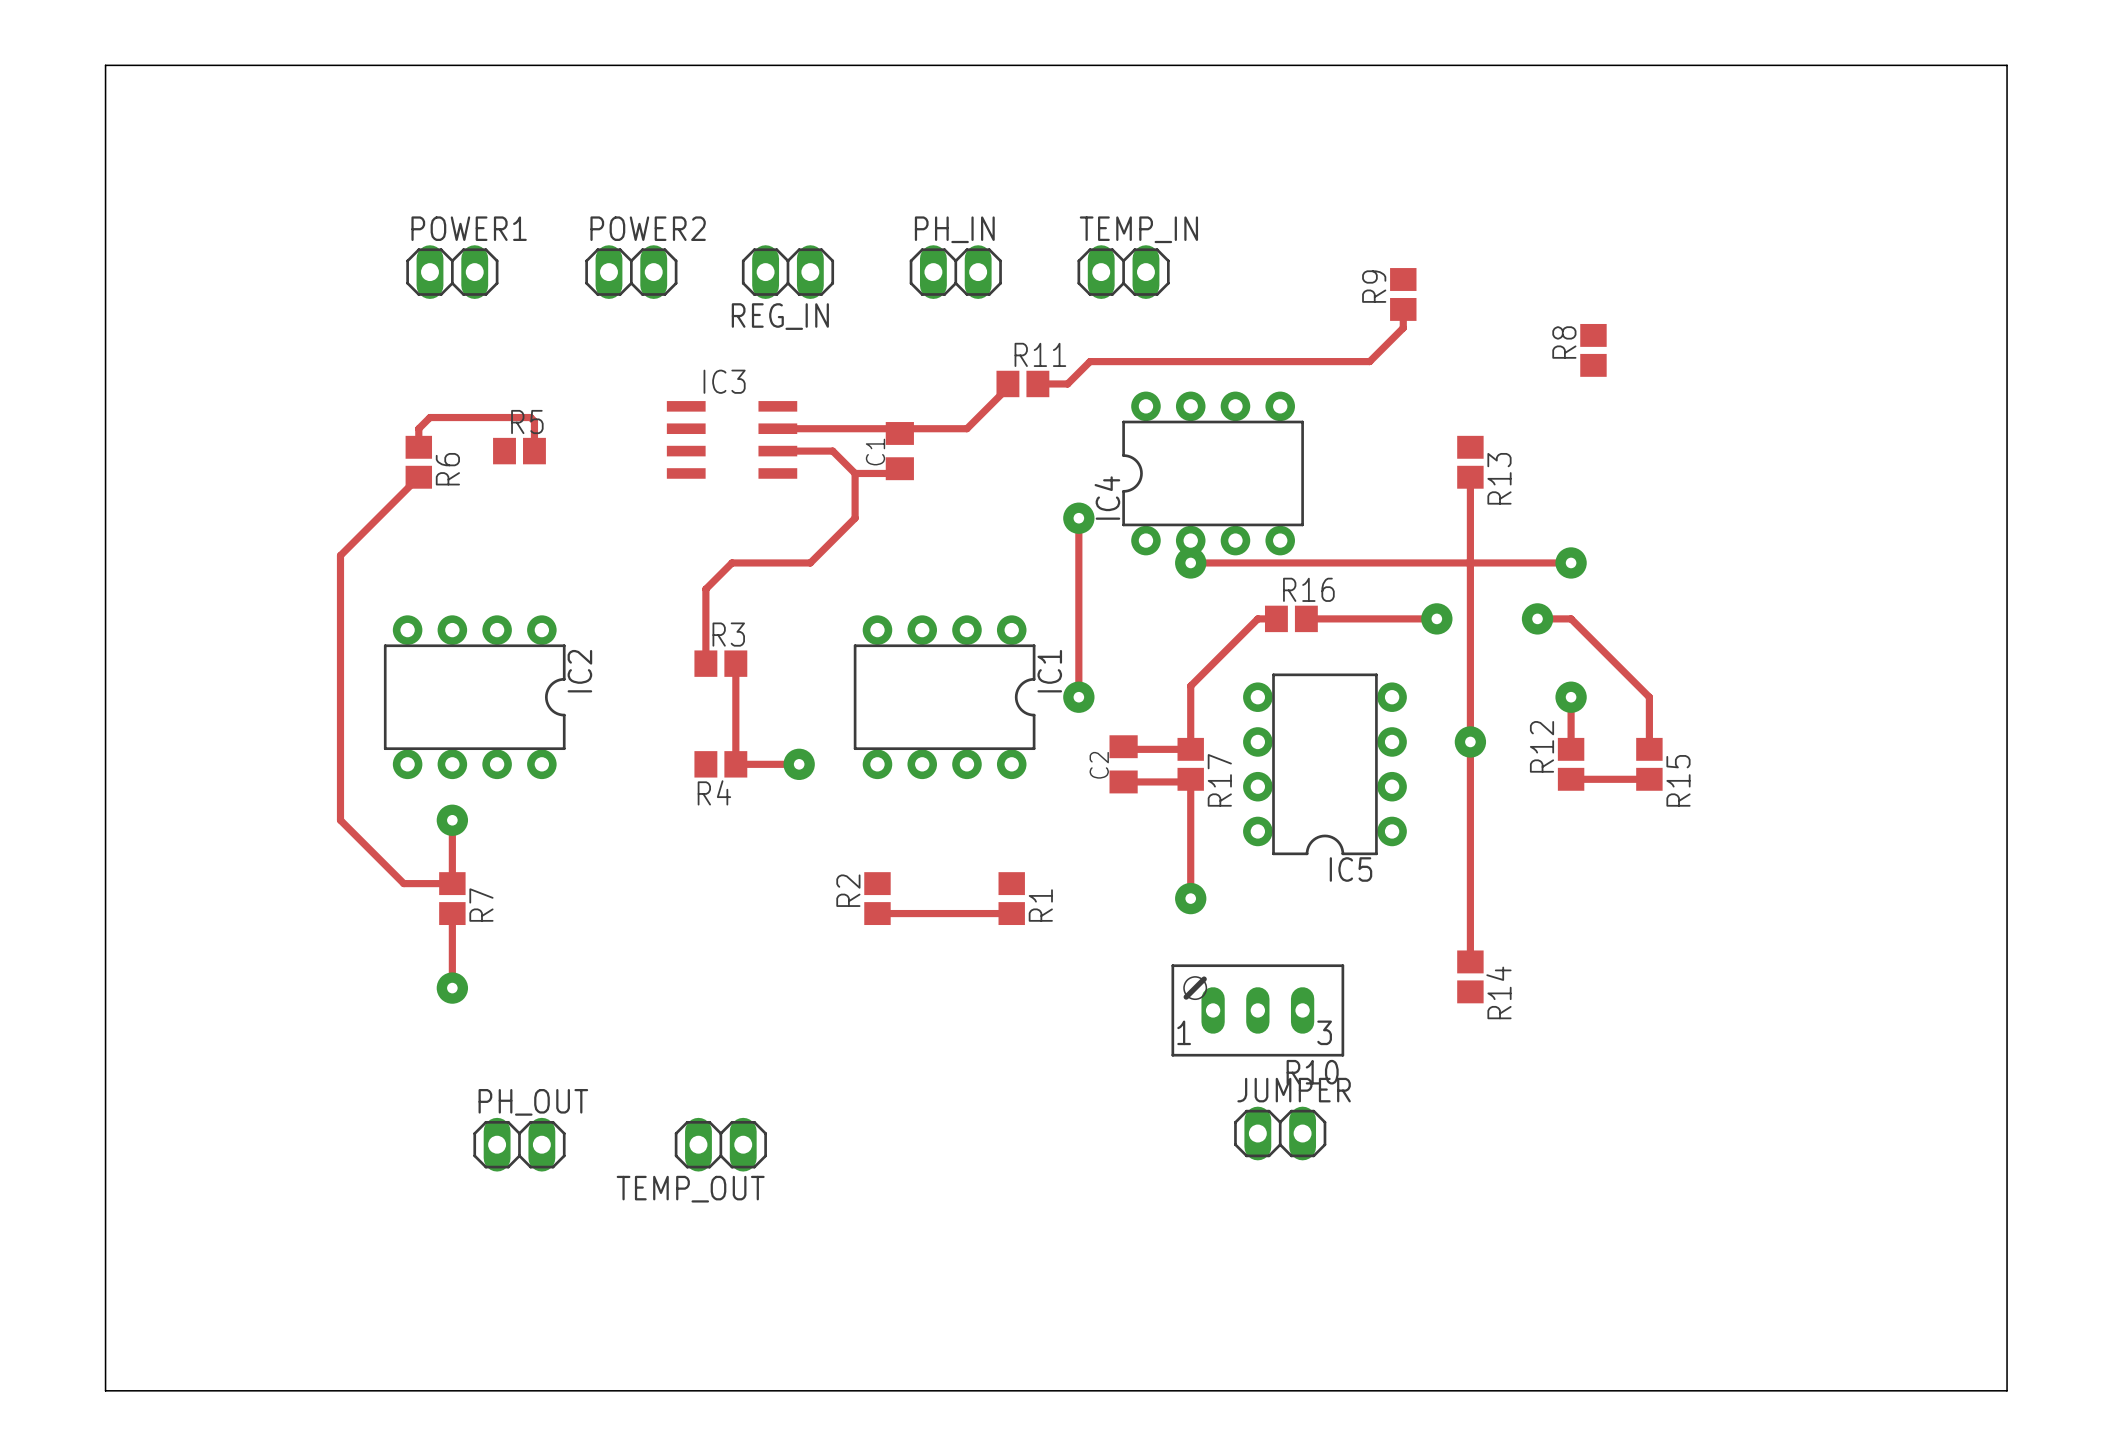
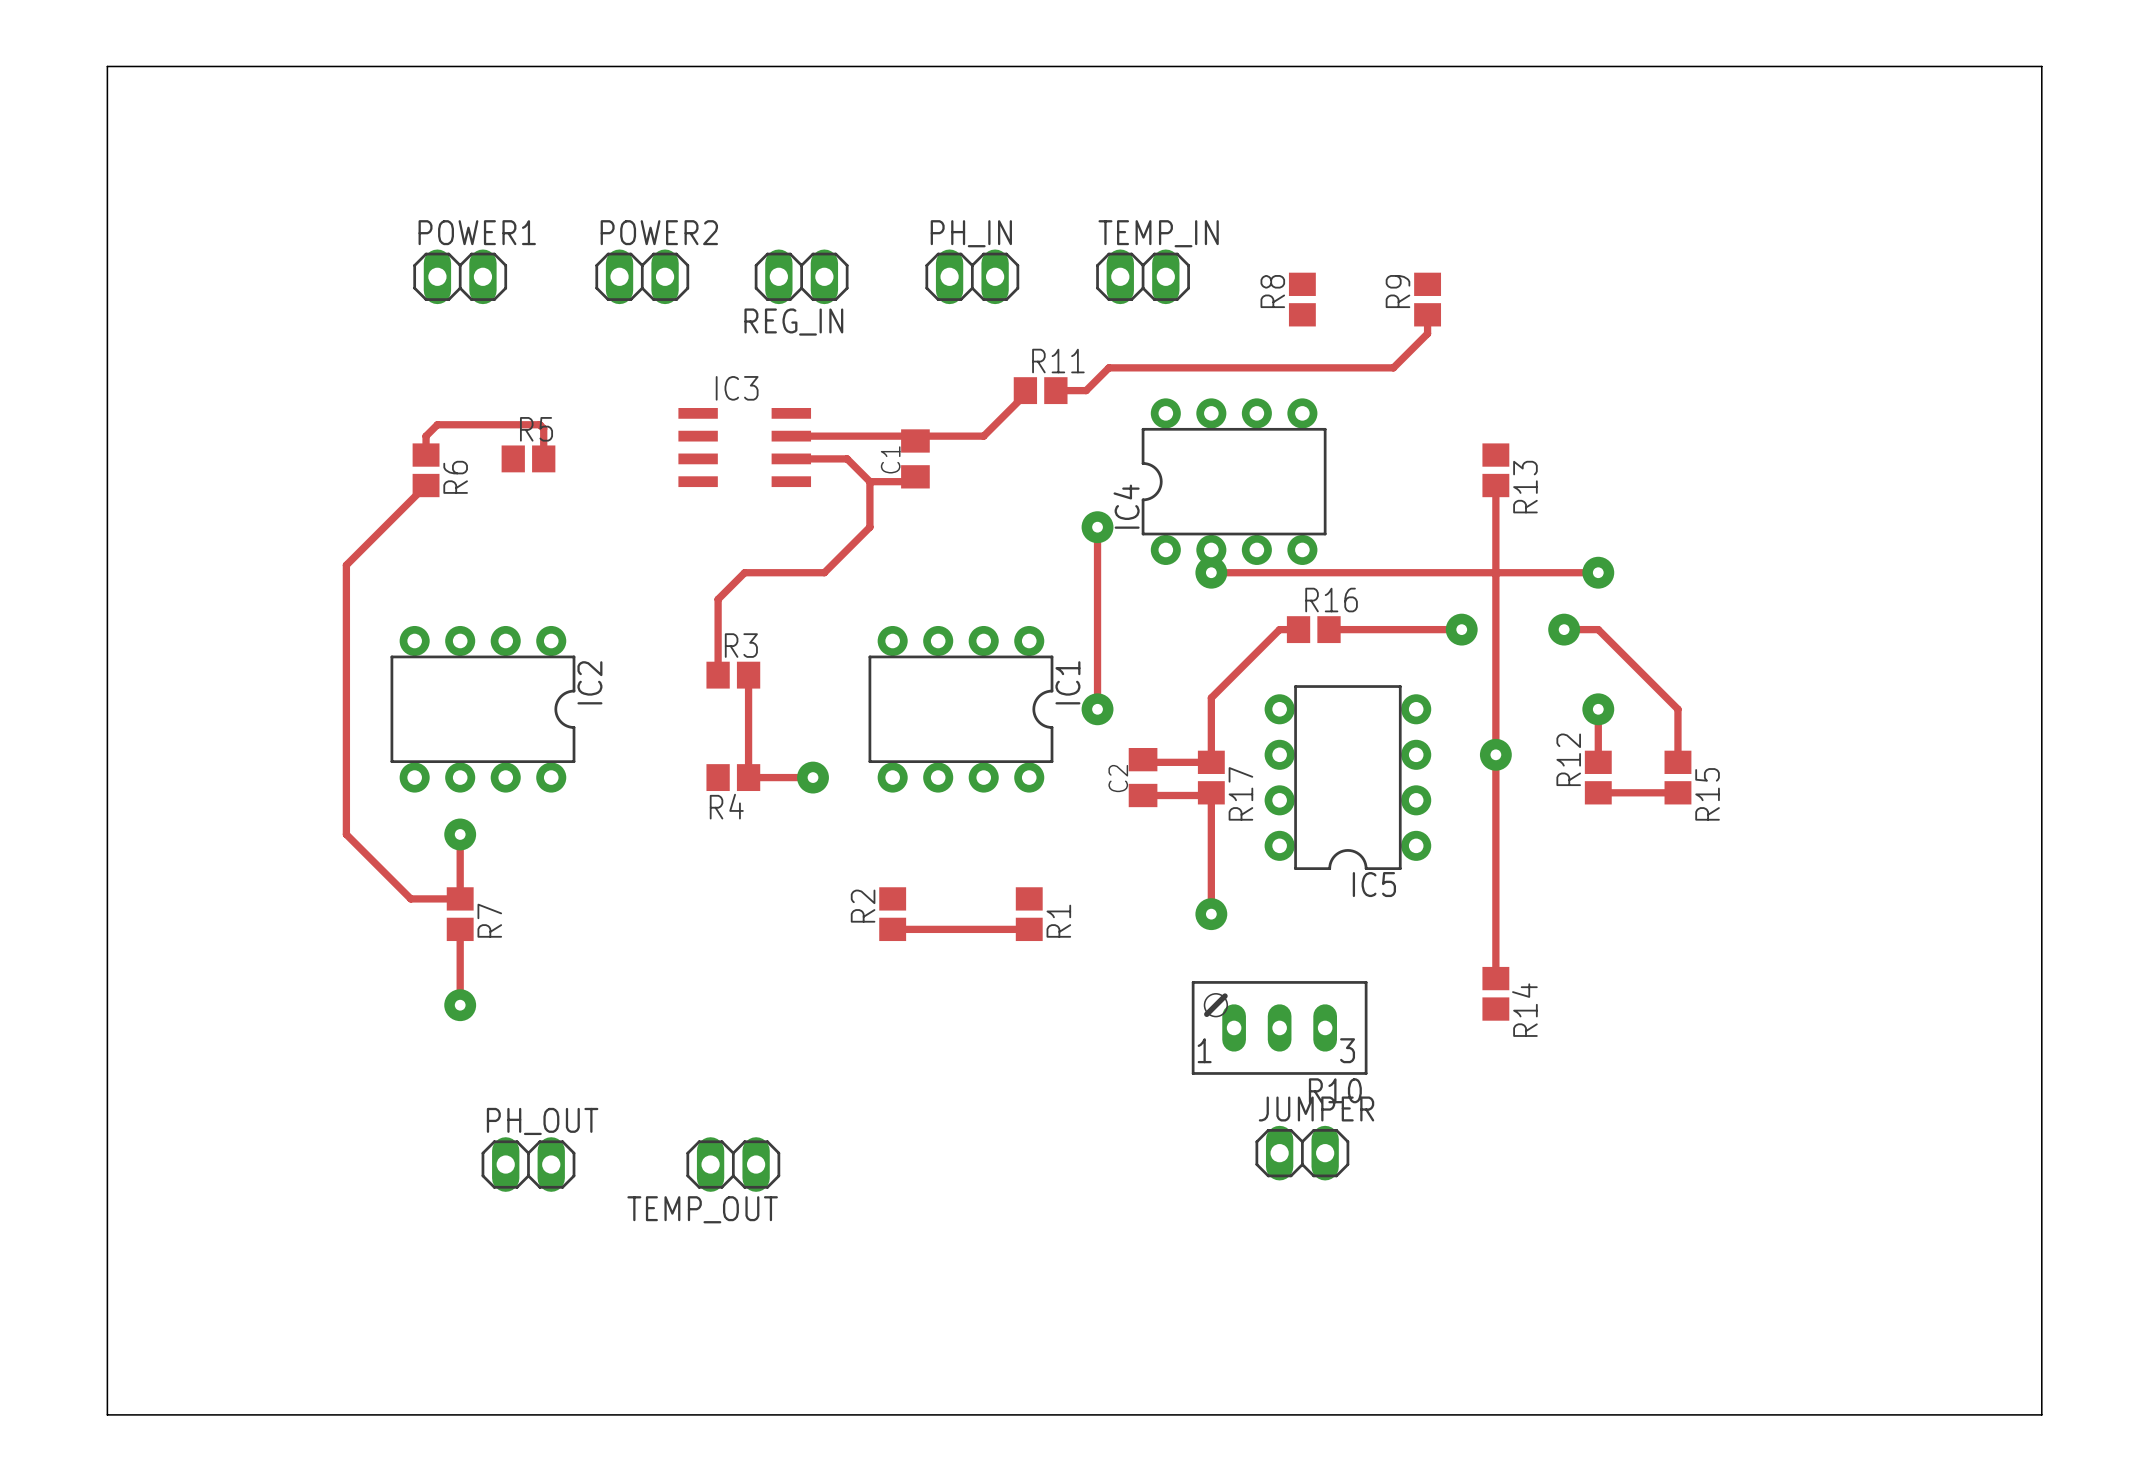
R8 position: (1593, 350) -> (1302, 299)

